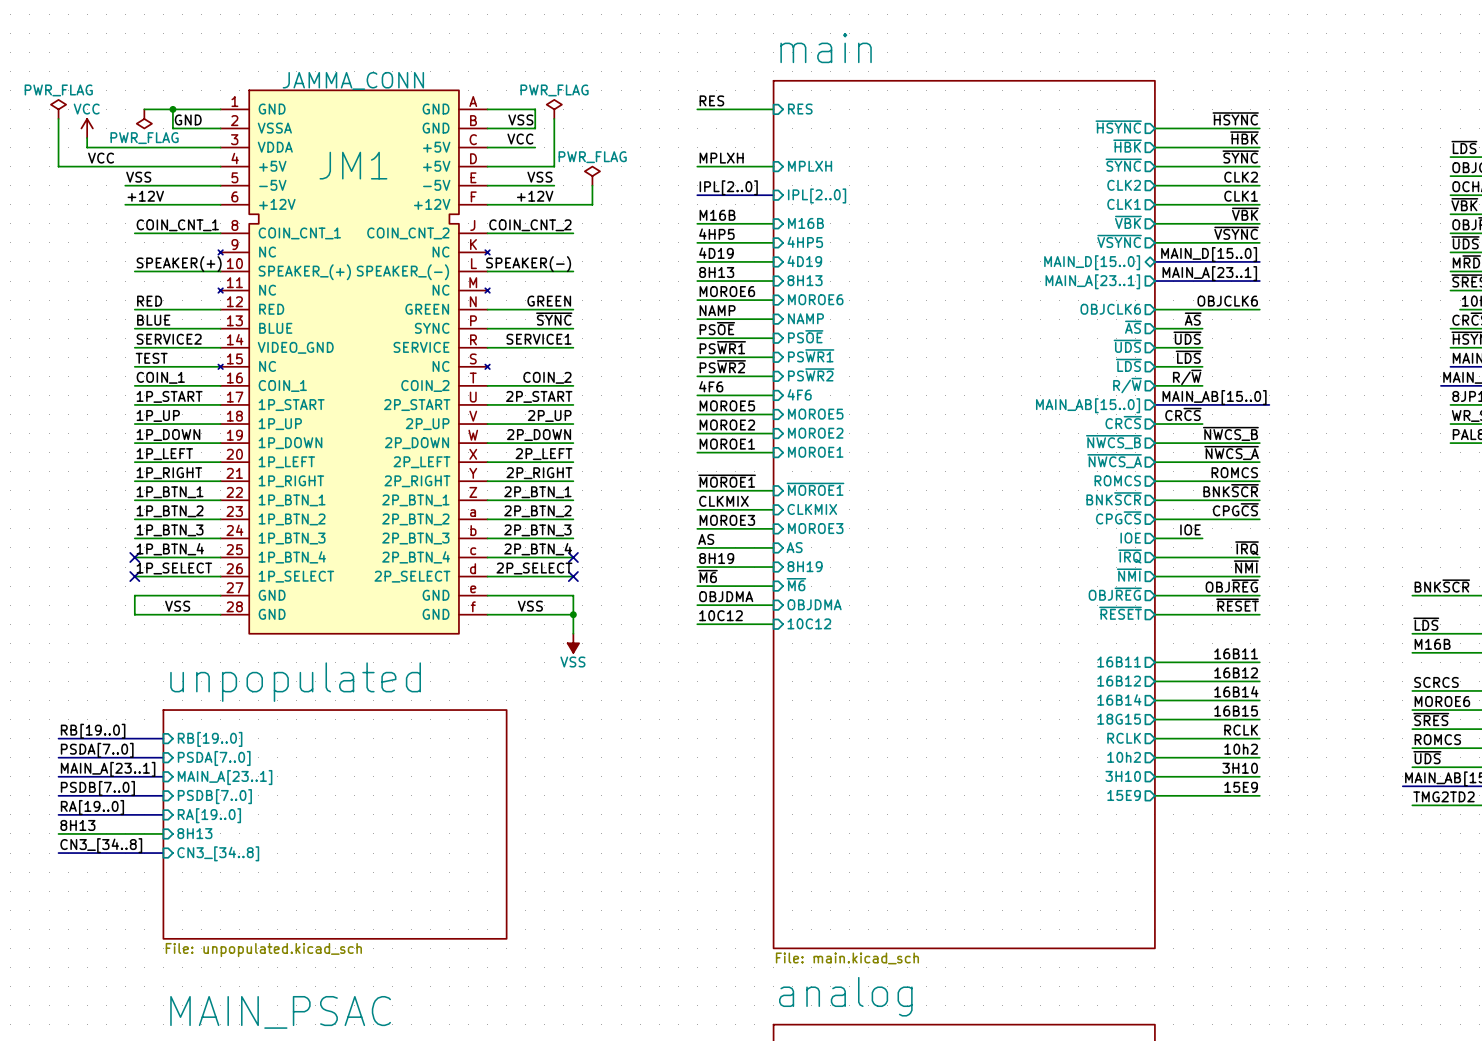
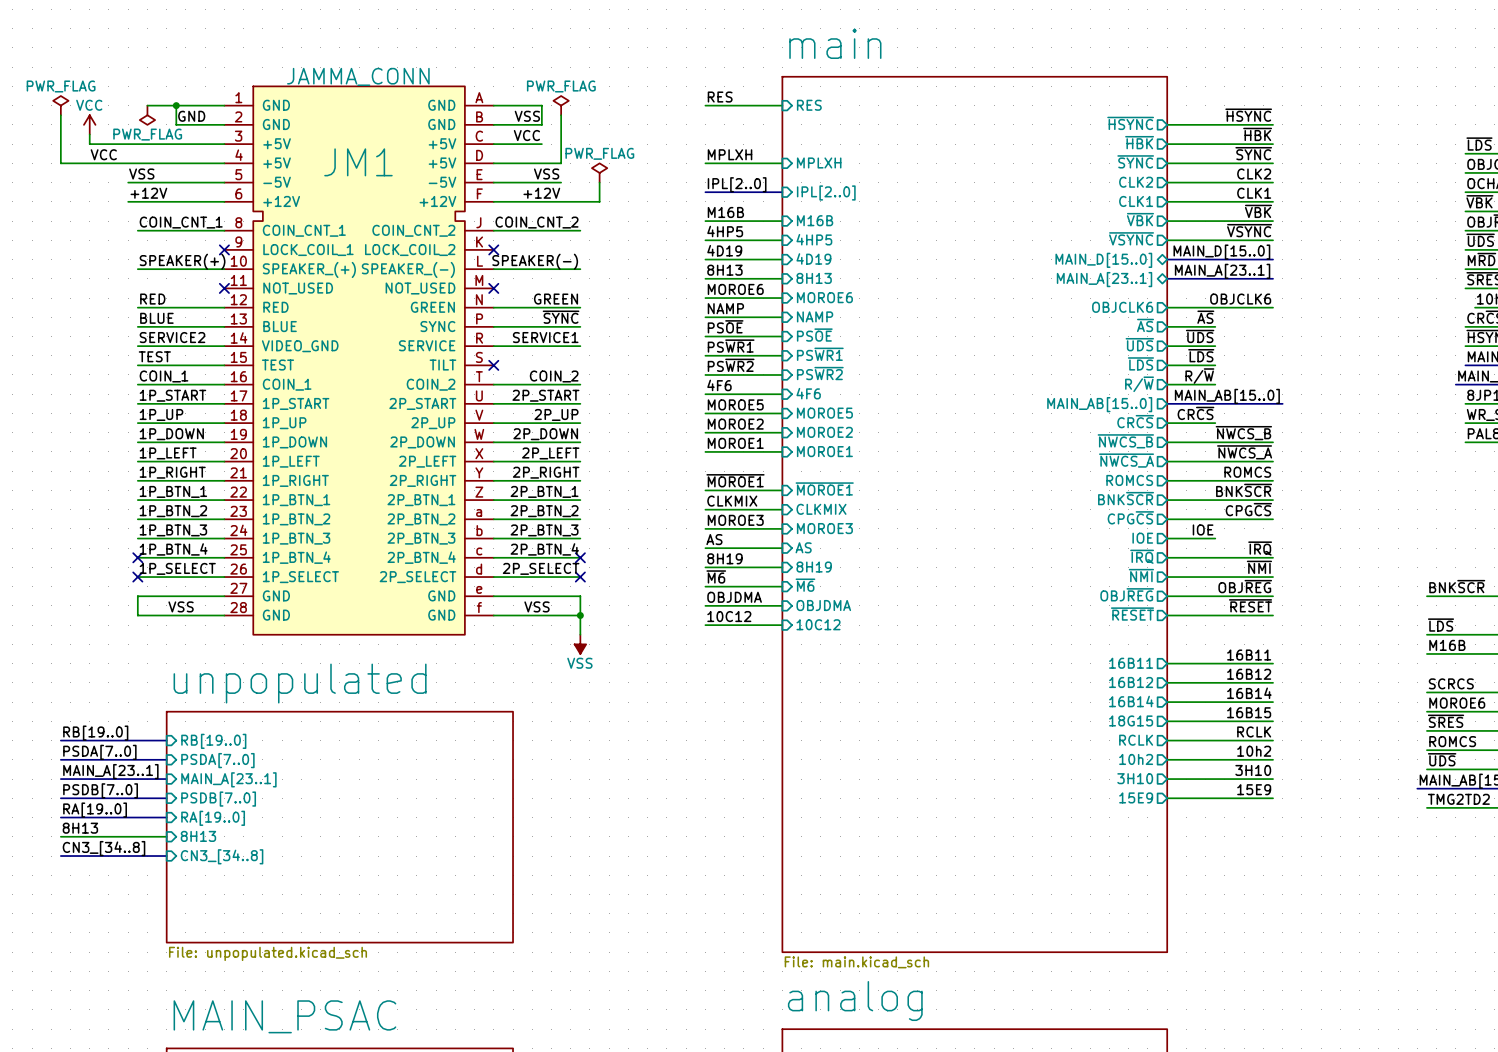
JM1 symbol: [218, 90, 490, 634] -> [224, 86, 494, 635]
no-connect mark: none -> (224, 249)
no-connect mark: none -> (493, 249)
sheet pin shape: output (1092, 281) -> bidirectional (1104, 279)
no-connect mark: none -> (224, 288)
no-connect mark: none -> (493, 288)
no-connect mark: none -> (493, 365)

